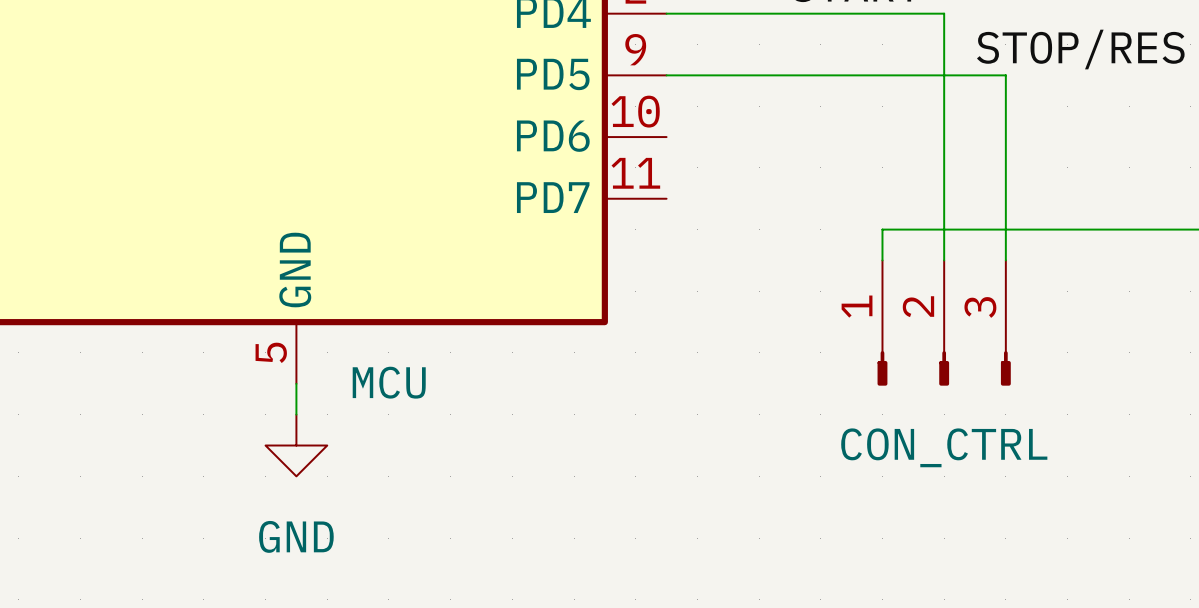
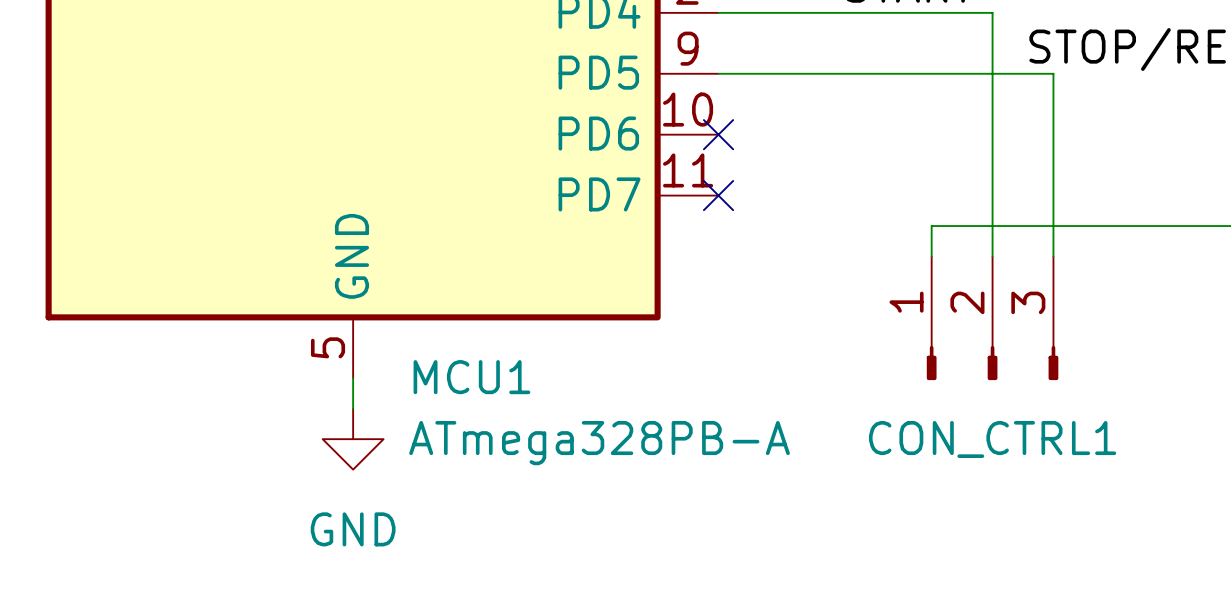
no-connect mark: none -> (718, 134)
no-connect mark: none -> (718, 195)
MCU name: MCU (389, 382) -> MCU1 (471, 377)
CON_CTRL name: CON_CTRL (944, 447) -> CON_CTRL1 (992, 439)
MCU value: none -> ATmega328PB-A (599, 443)

